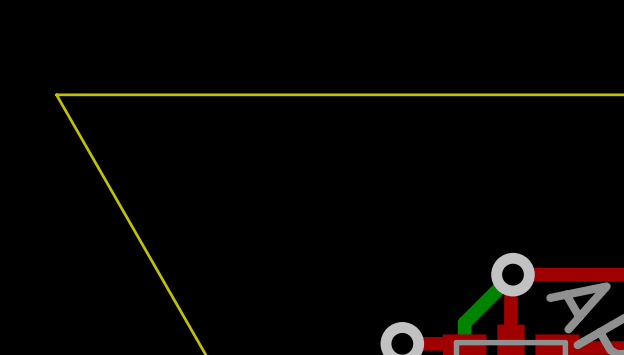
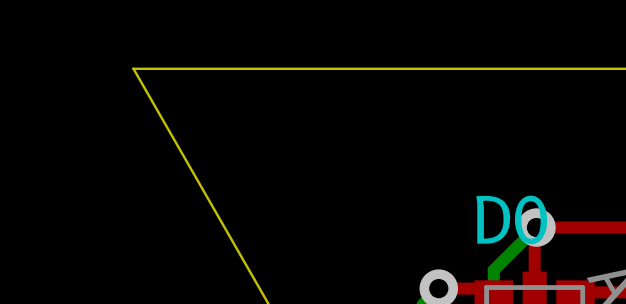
text: none -> D0 (511, 219)

